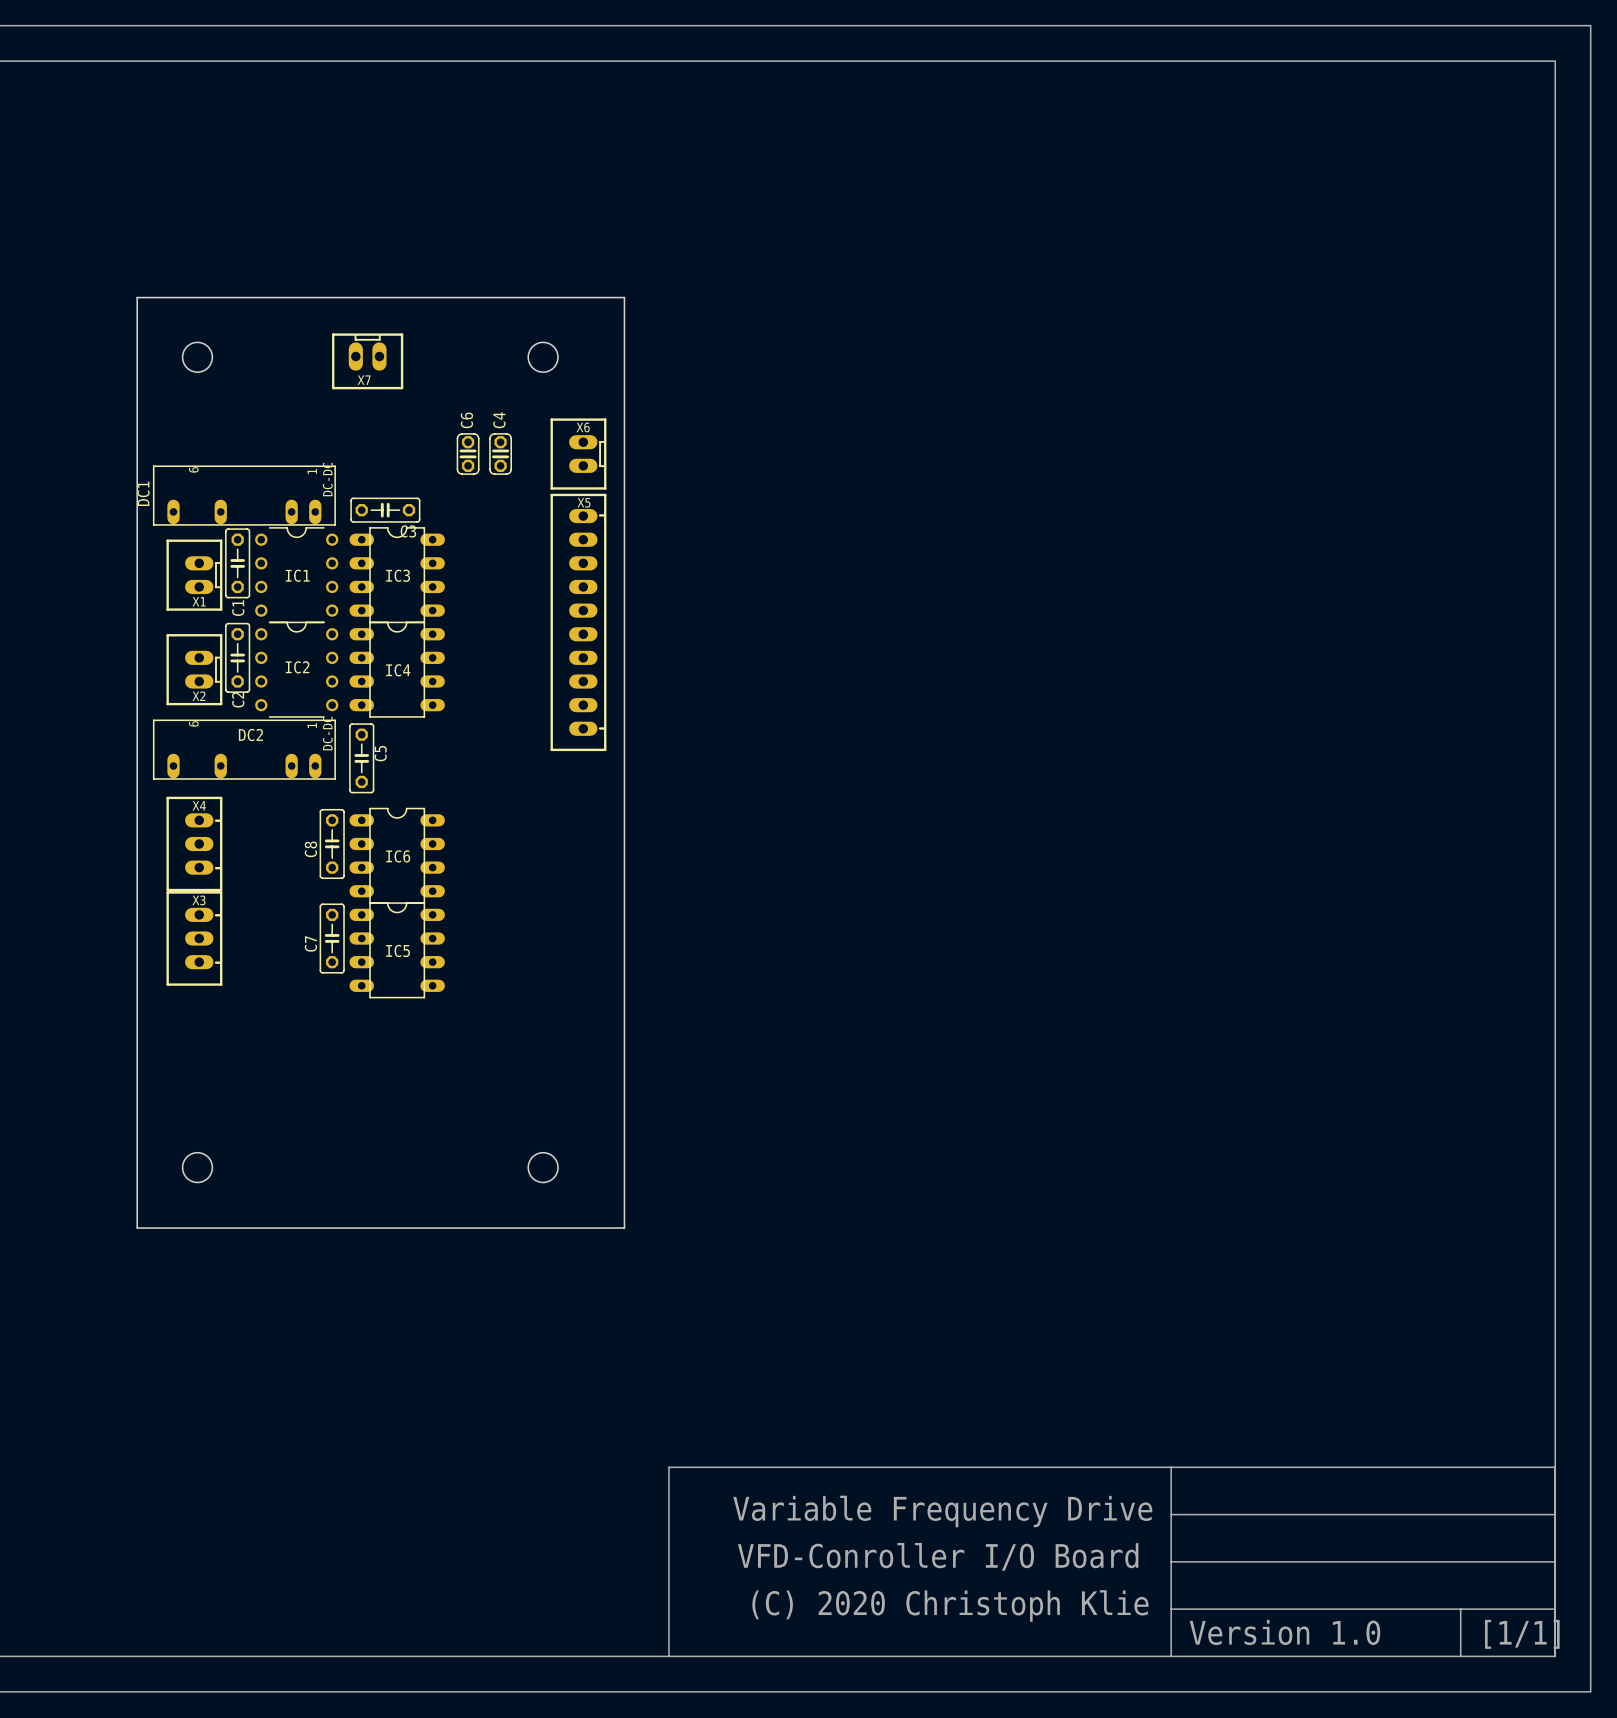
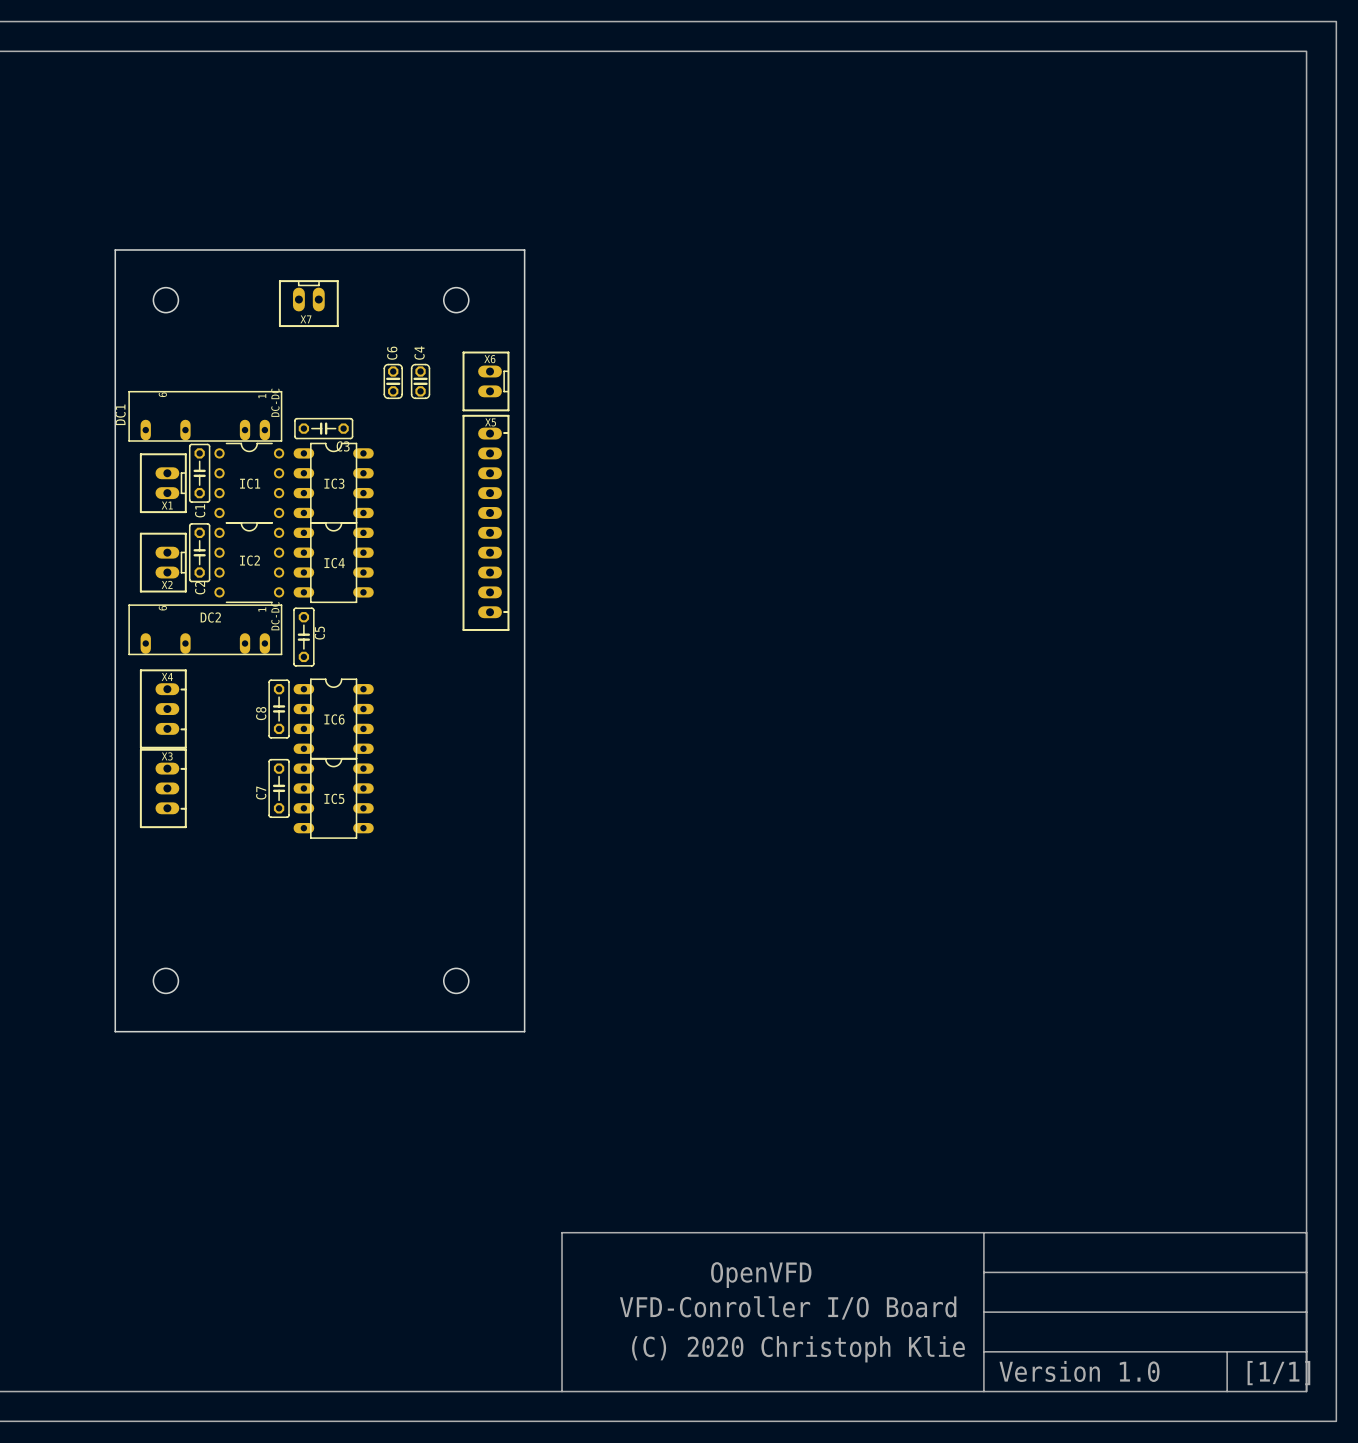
text: Variable Frequency Drive (942, 1511) -> none
text: none -> OpenVFD (761, 1275)

